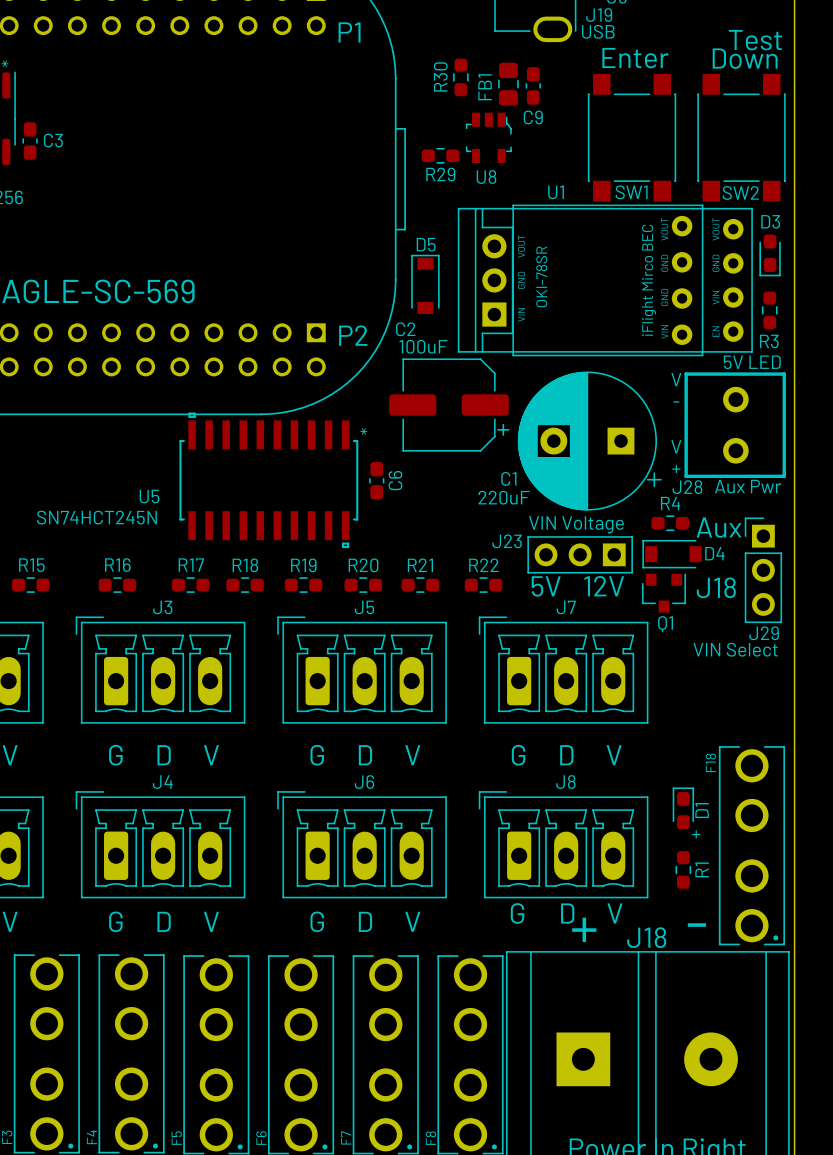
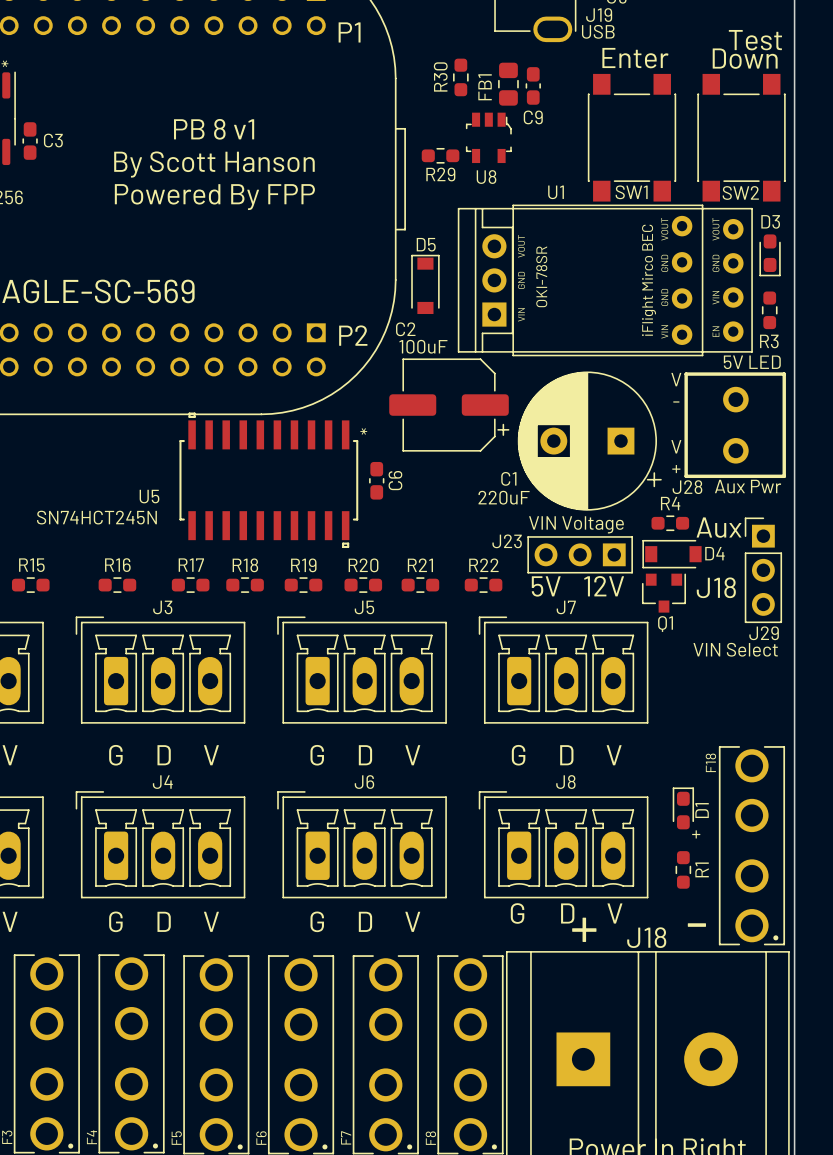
text: none -> PB 8 v1 (214, 129)
text: none -> By Scott Hanson (214, 164)
text: none -> Powered By FPP (214, 197)

